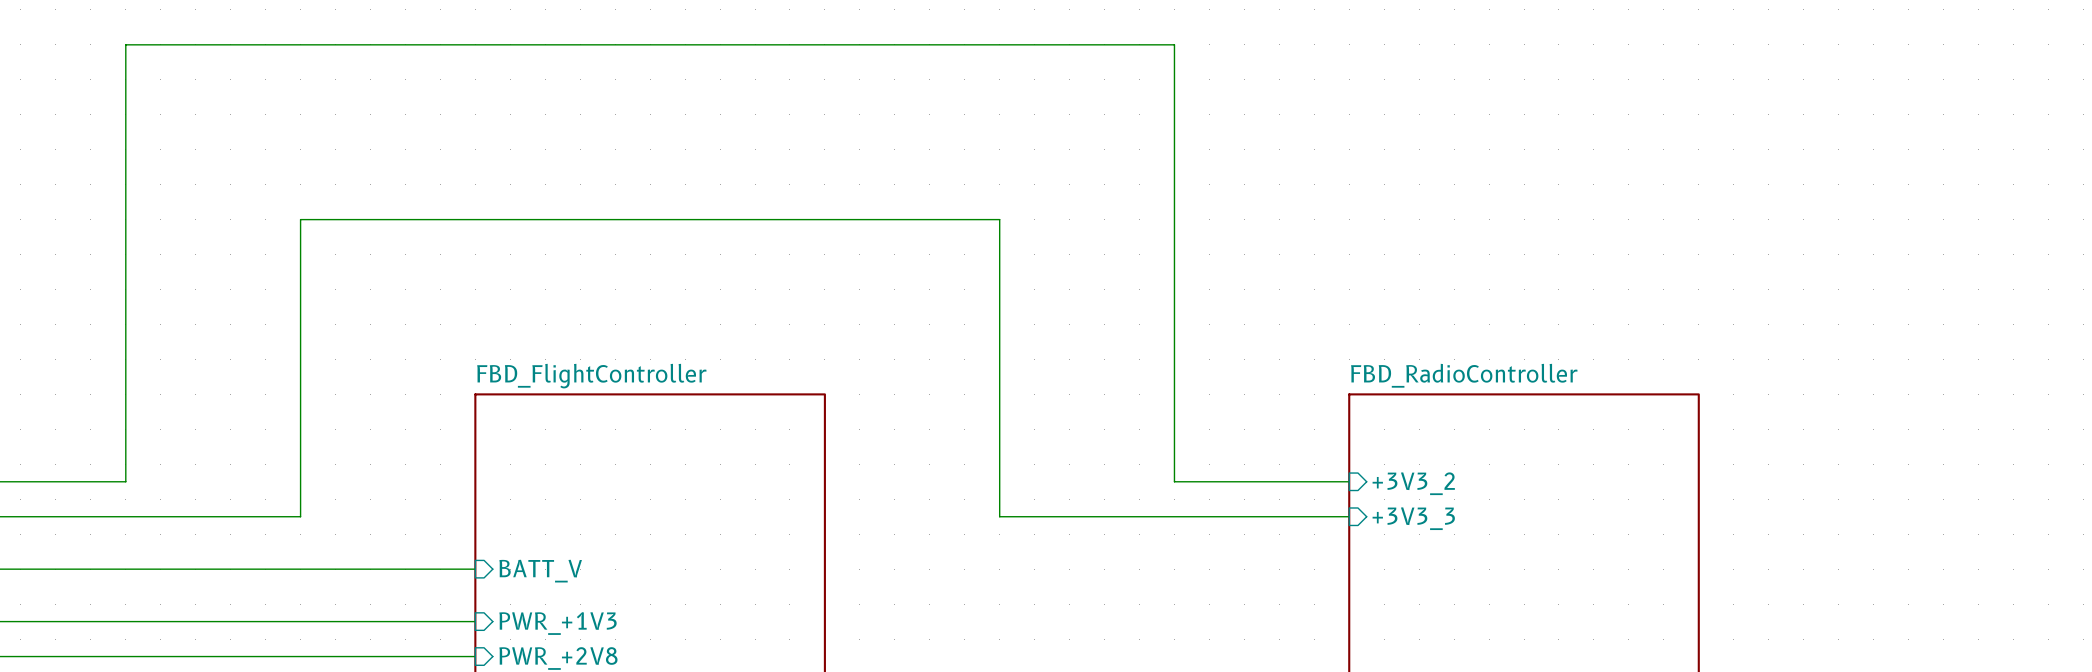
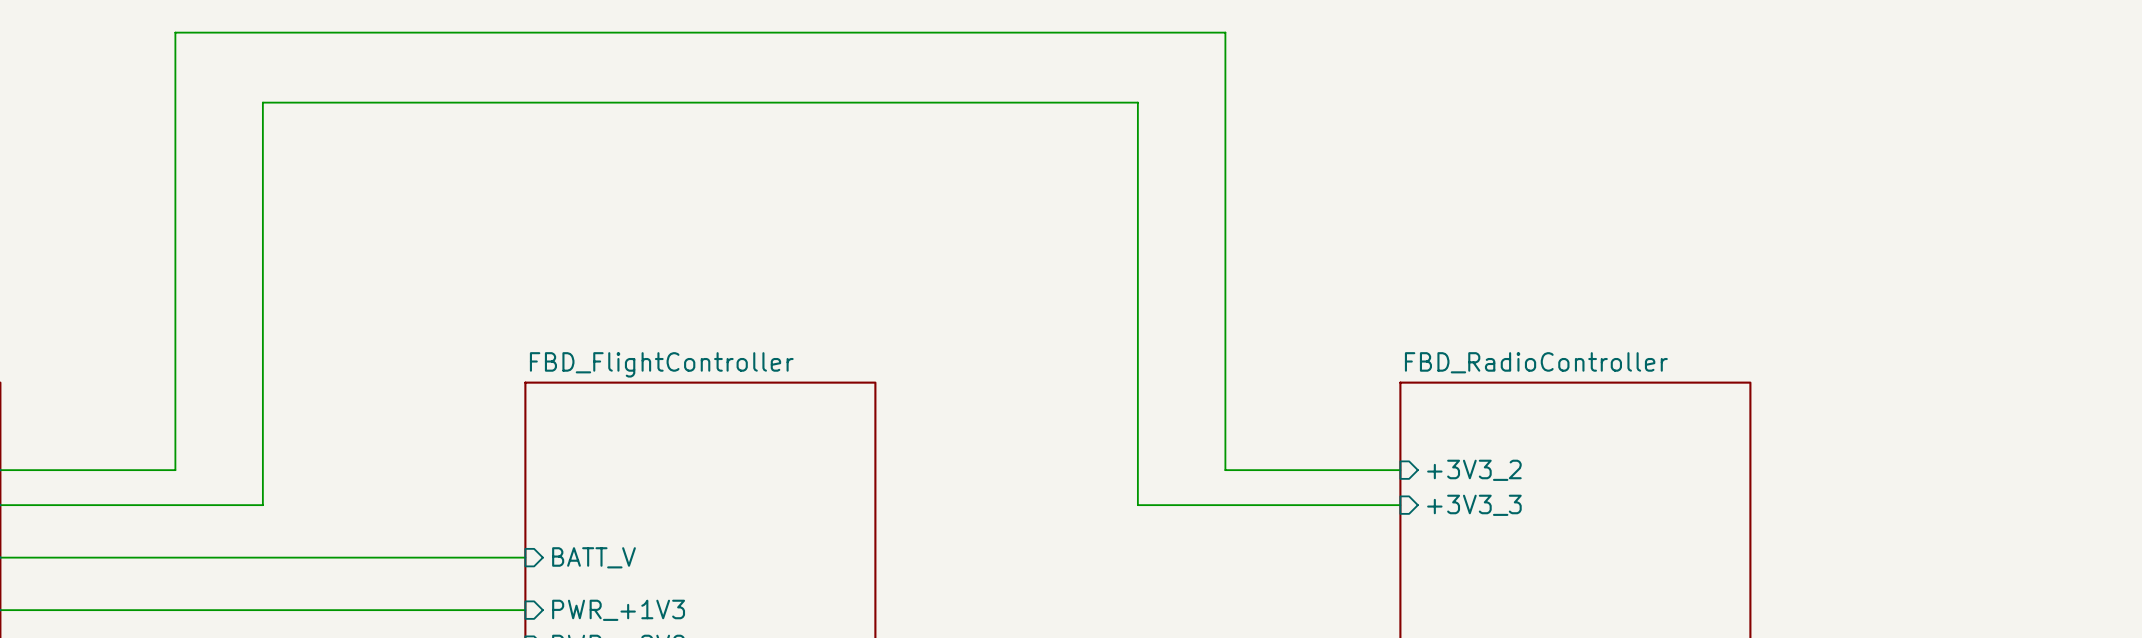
wire: (213, 516) (300, 516) (300, 219) (999, 219) (999, 516) (1087, 516) -> (262, 505) (262, 102) (1137, 102) (1137, 505)

